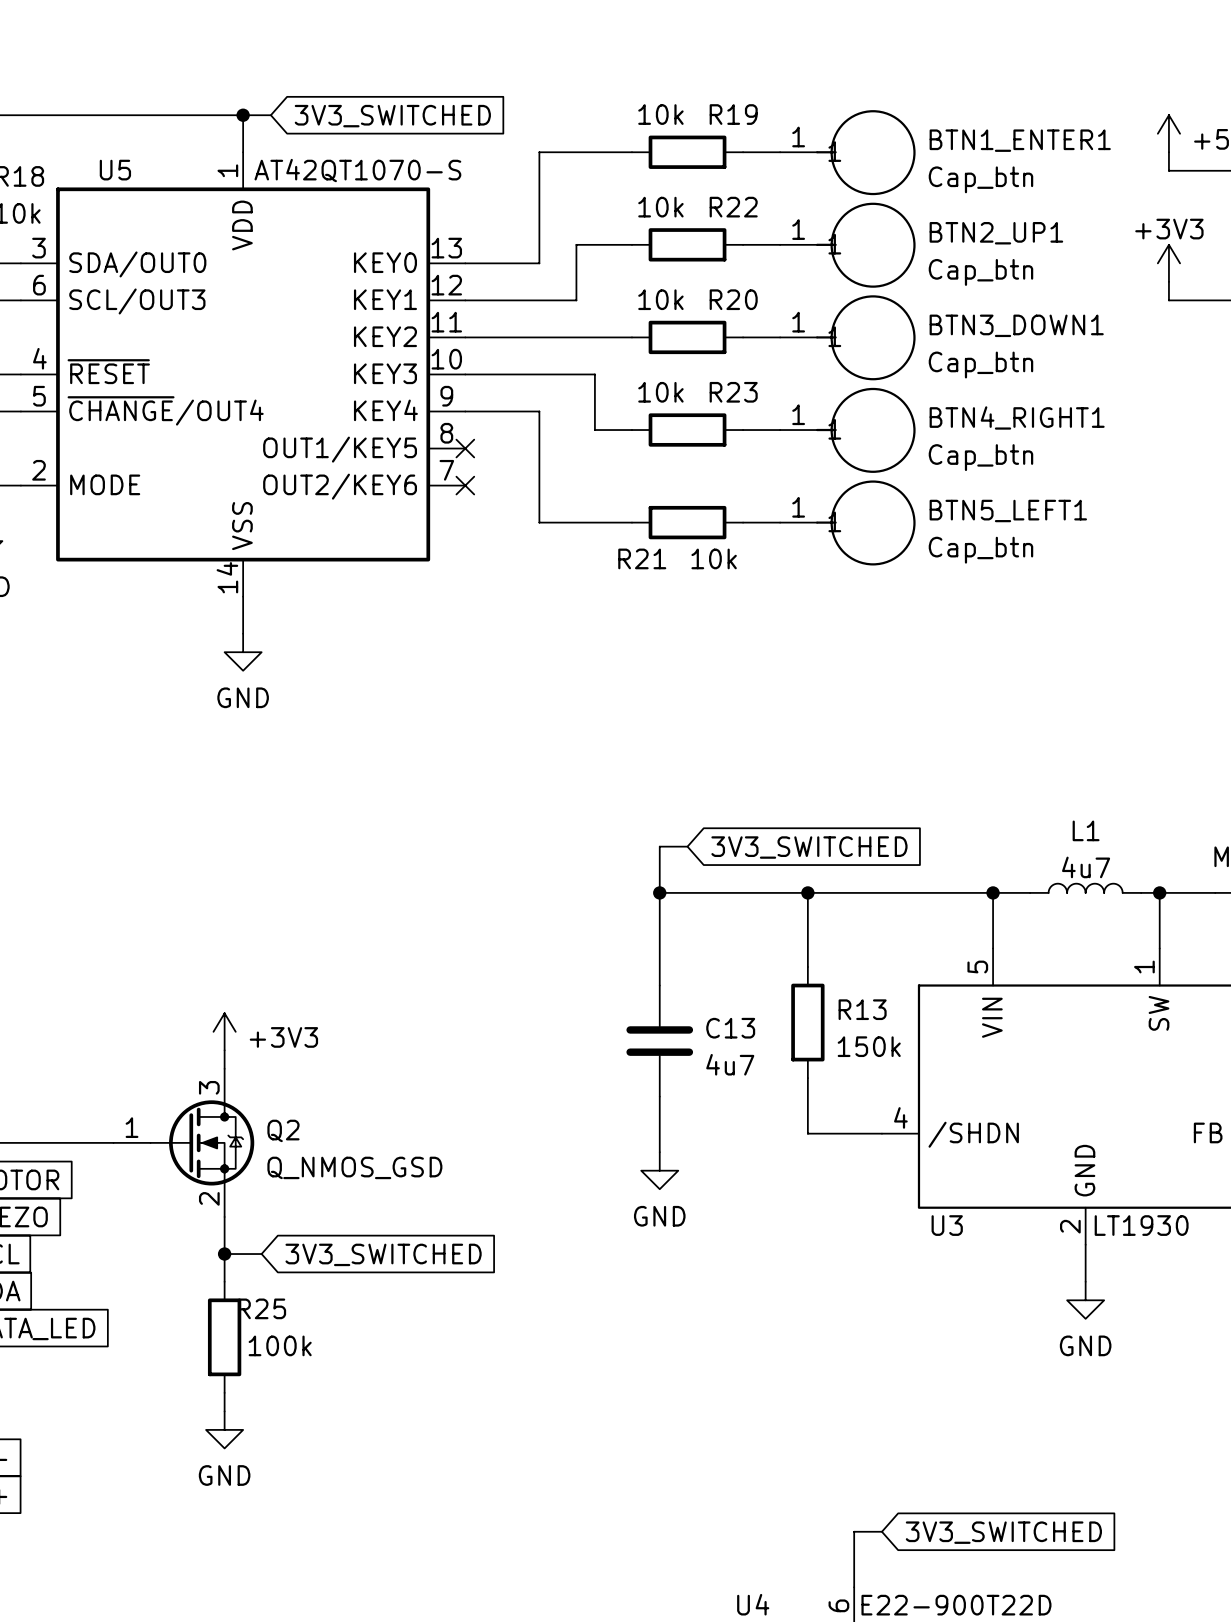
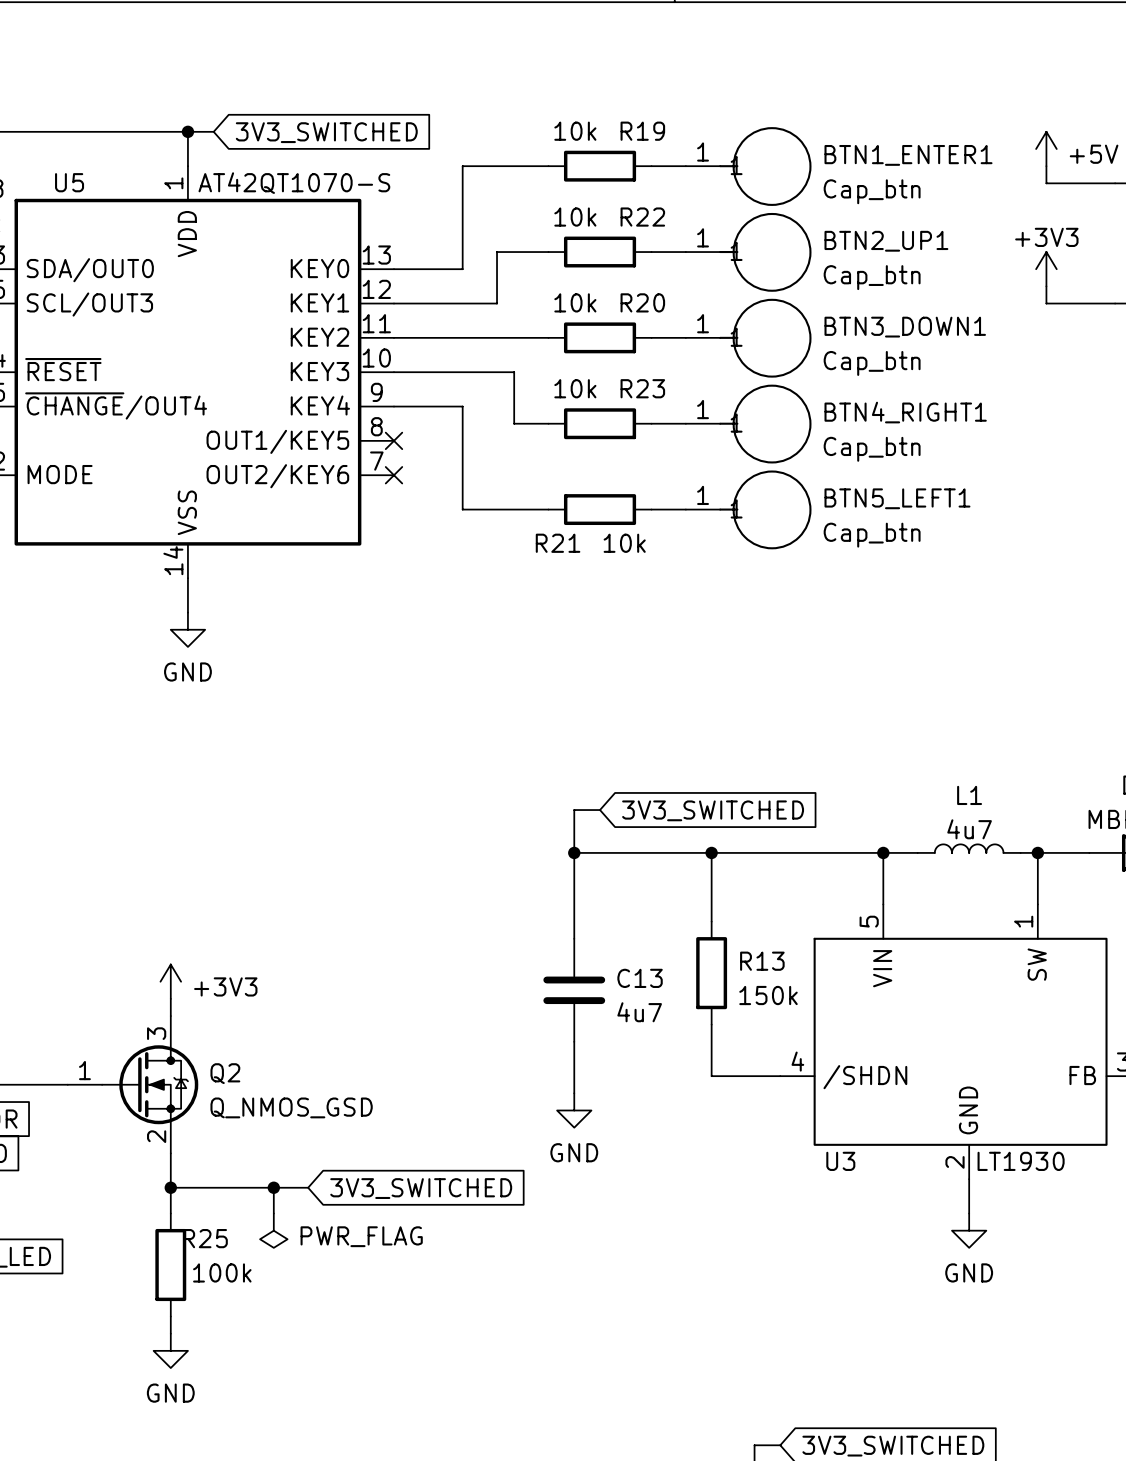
wire: none -> (205, 1187) (308, 1187)
wire: none -> (273, 1187) (273, 1213)
junction: none -> (273, 1187)
global label position: 3V3_SWITCHED (383, 1254) -> 3V3_SWITCHED (421, 1188)
power symbol: none -> PWR_FLAG (273, 1230)

